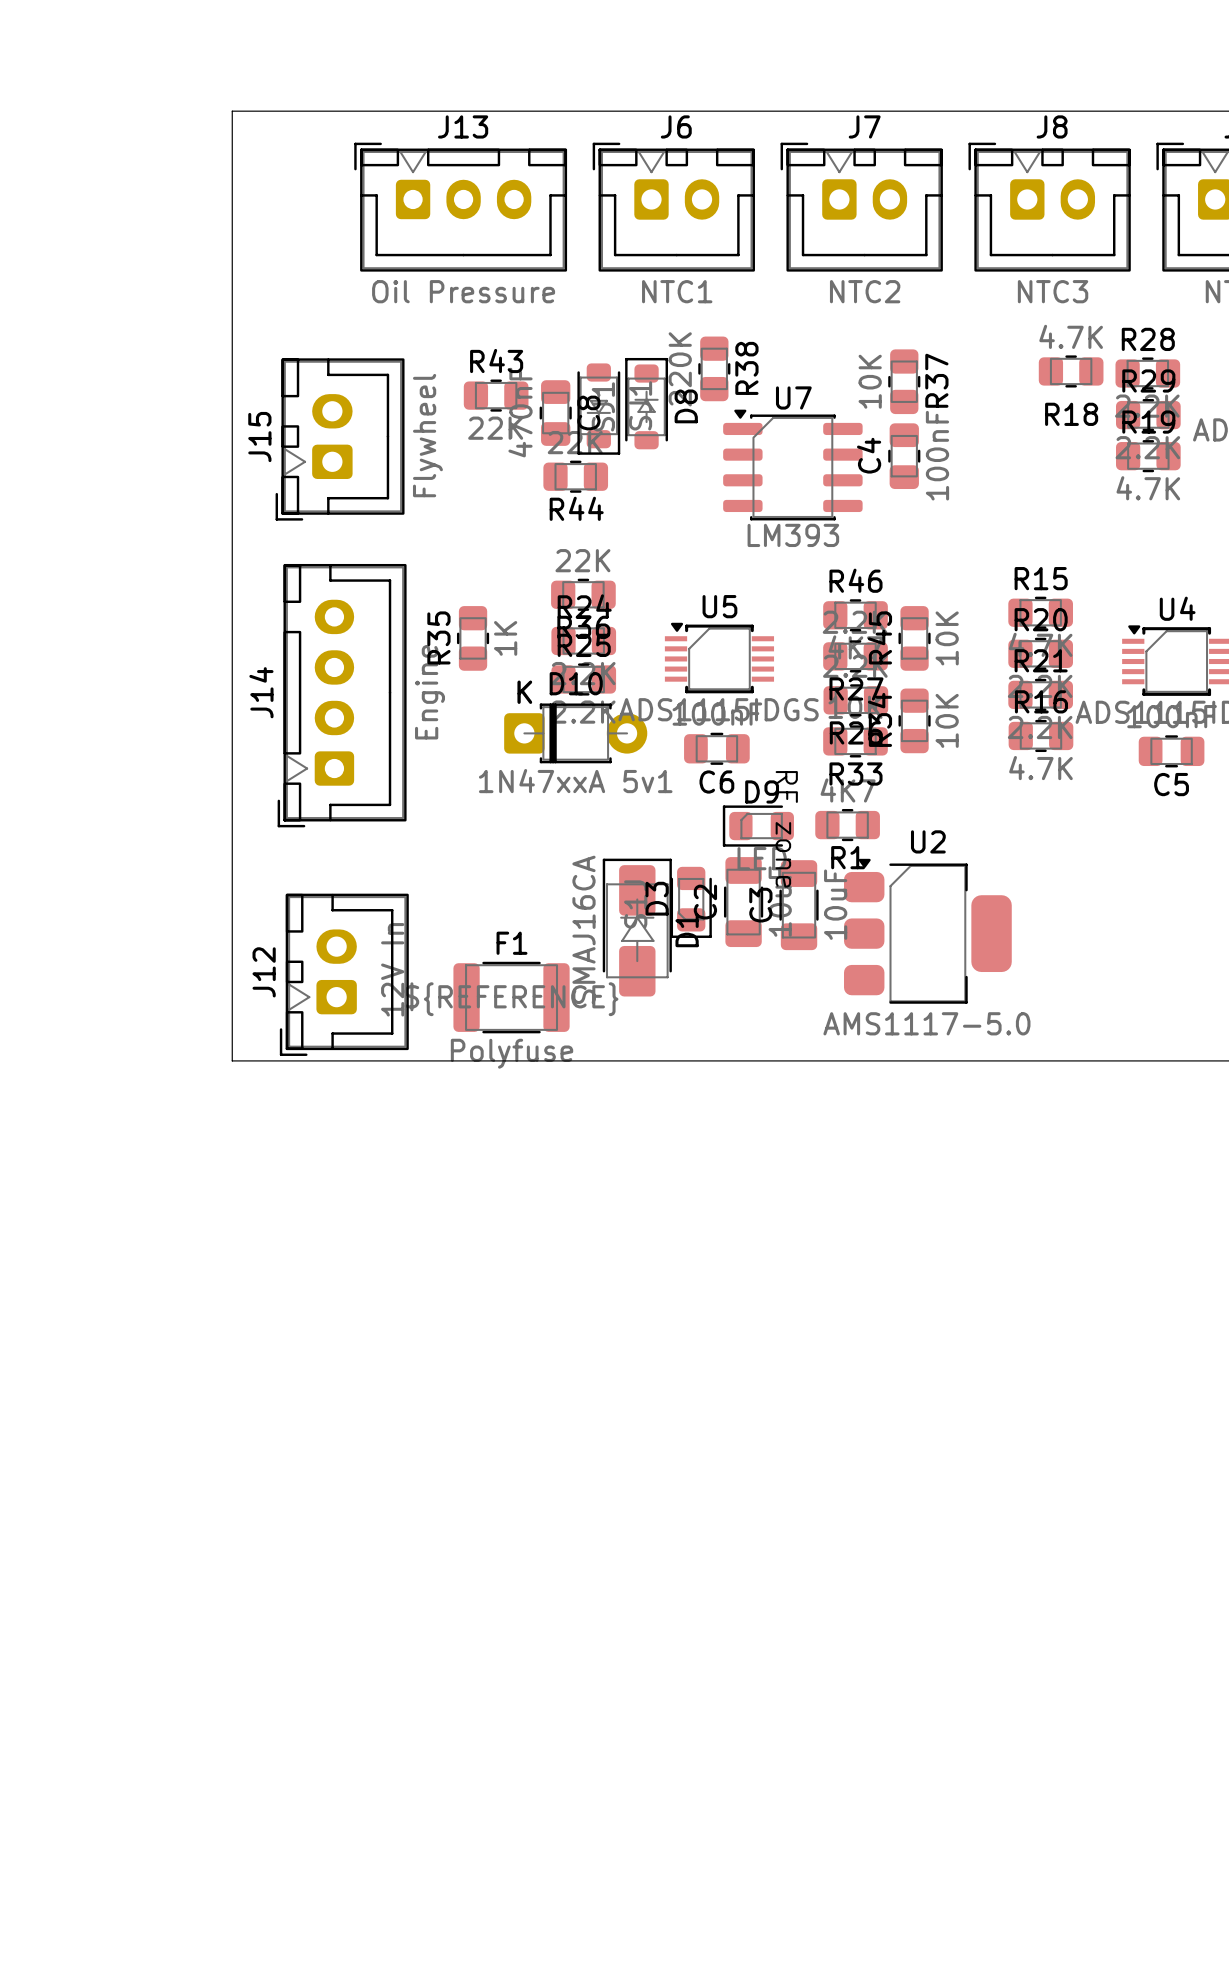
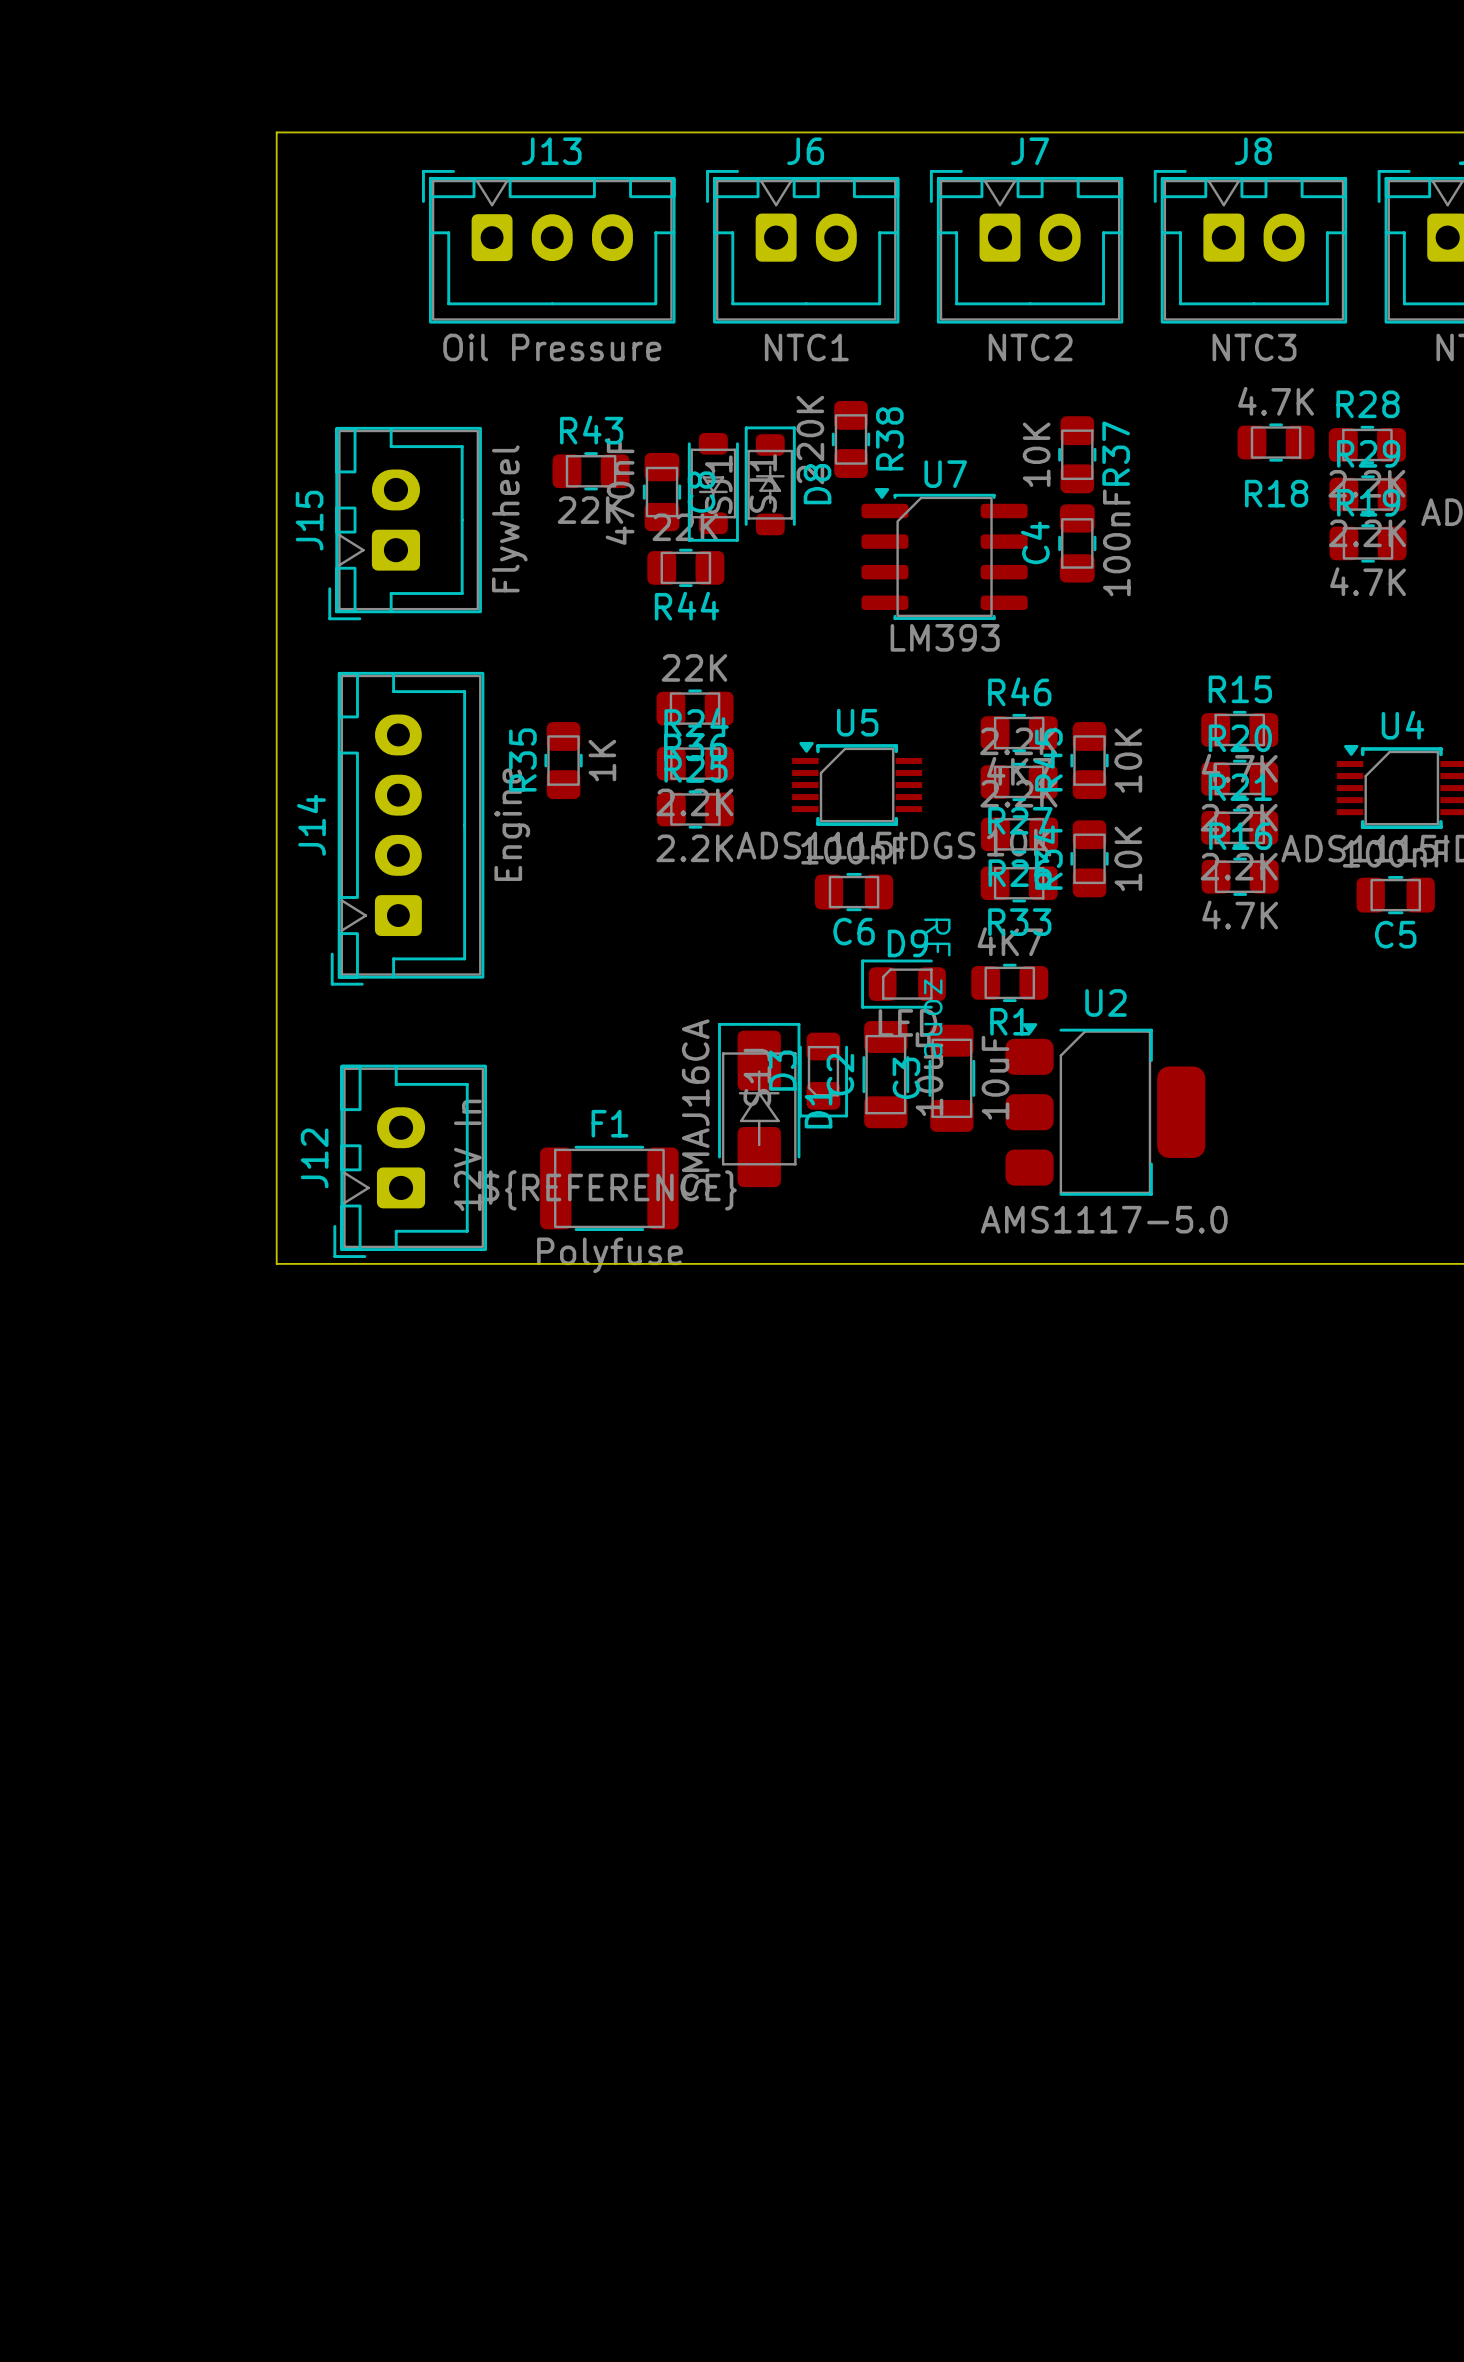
D10: 1N47xxA 5v1 (575, 733) -> none

